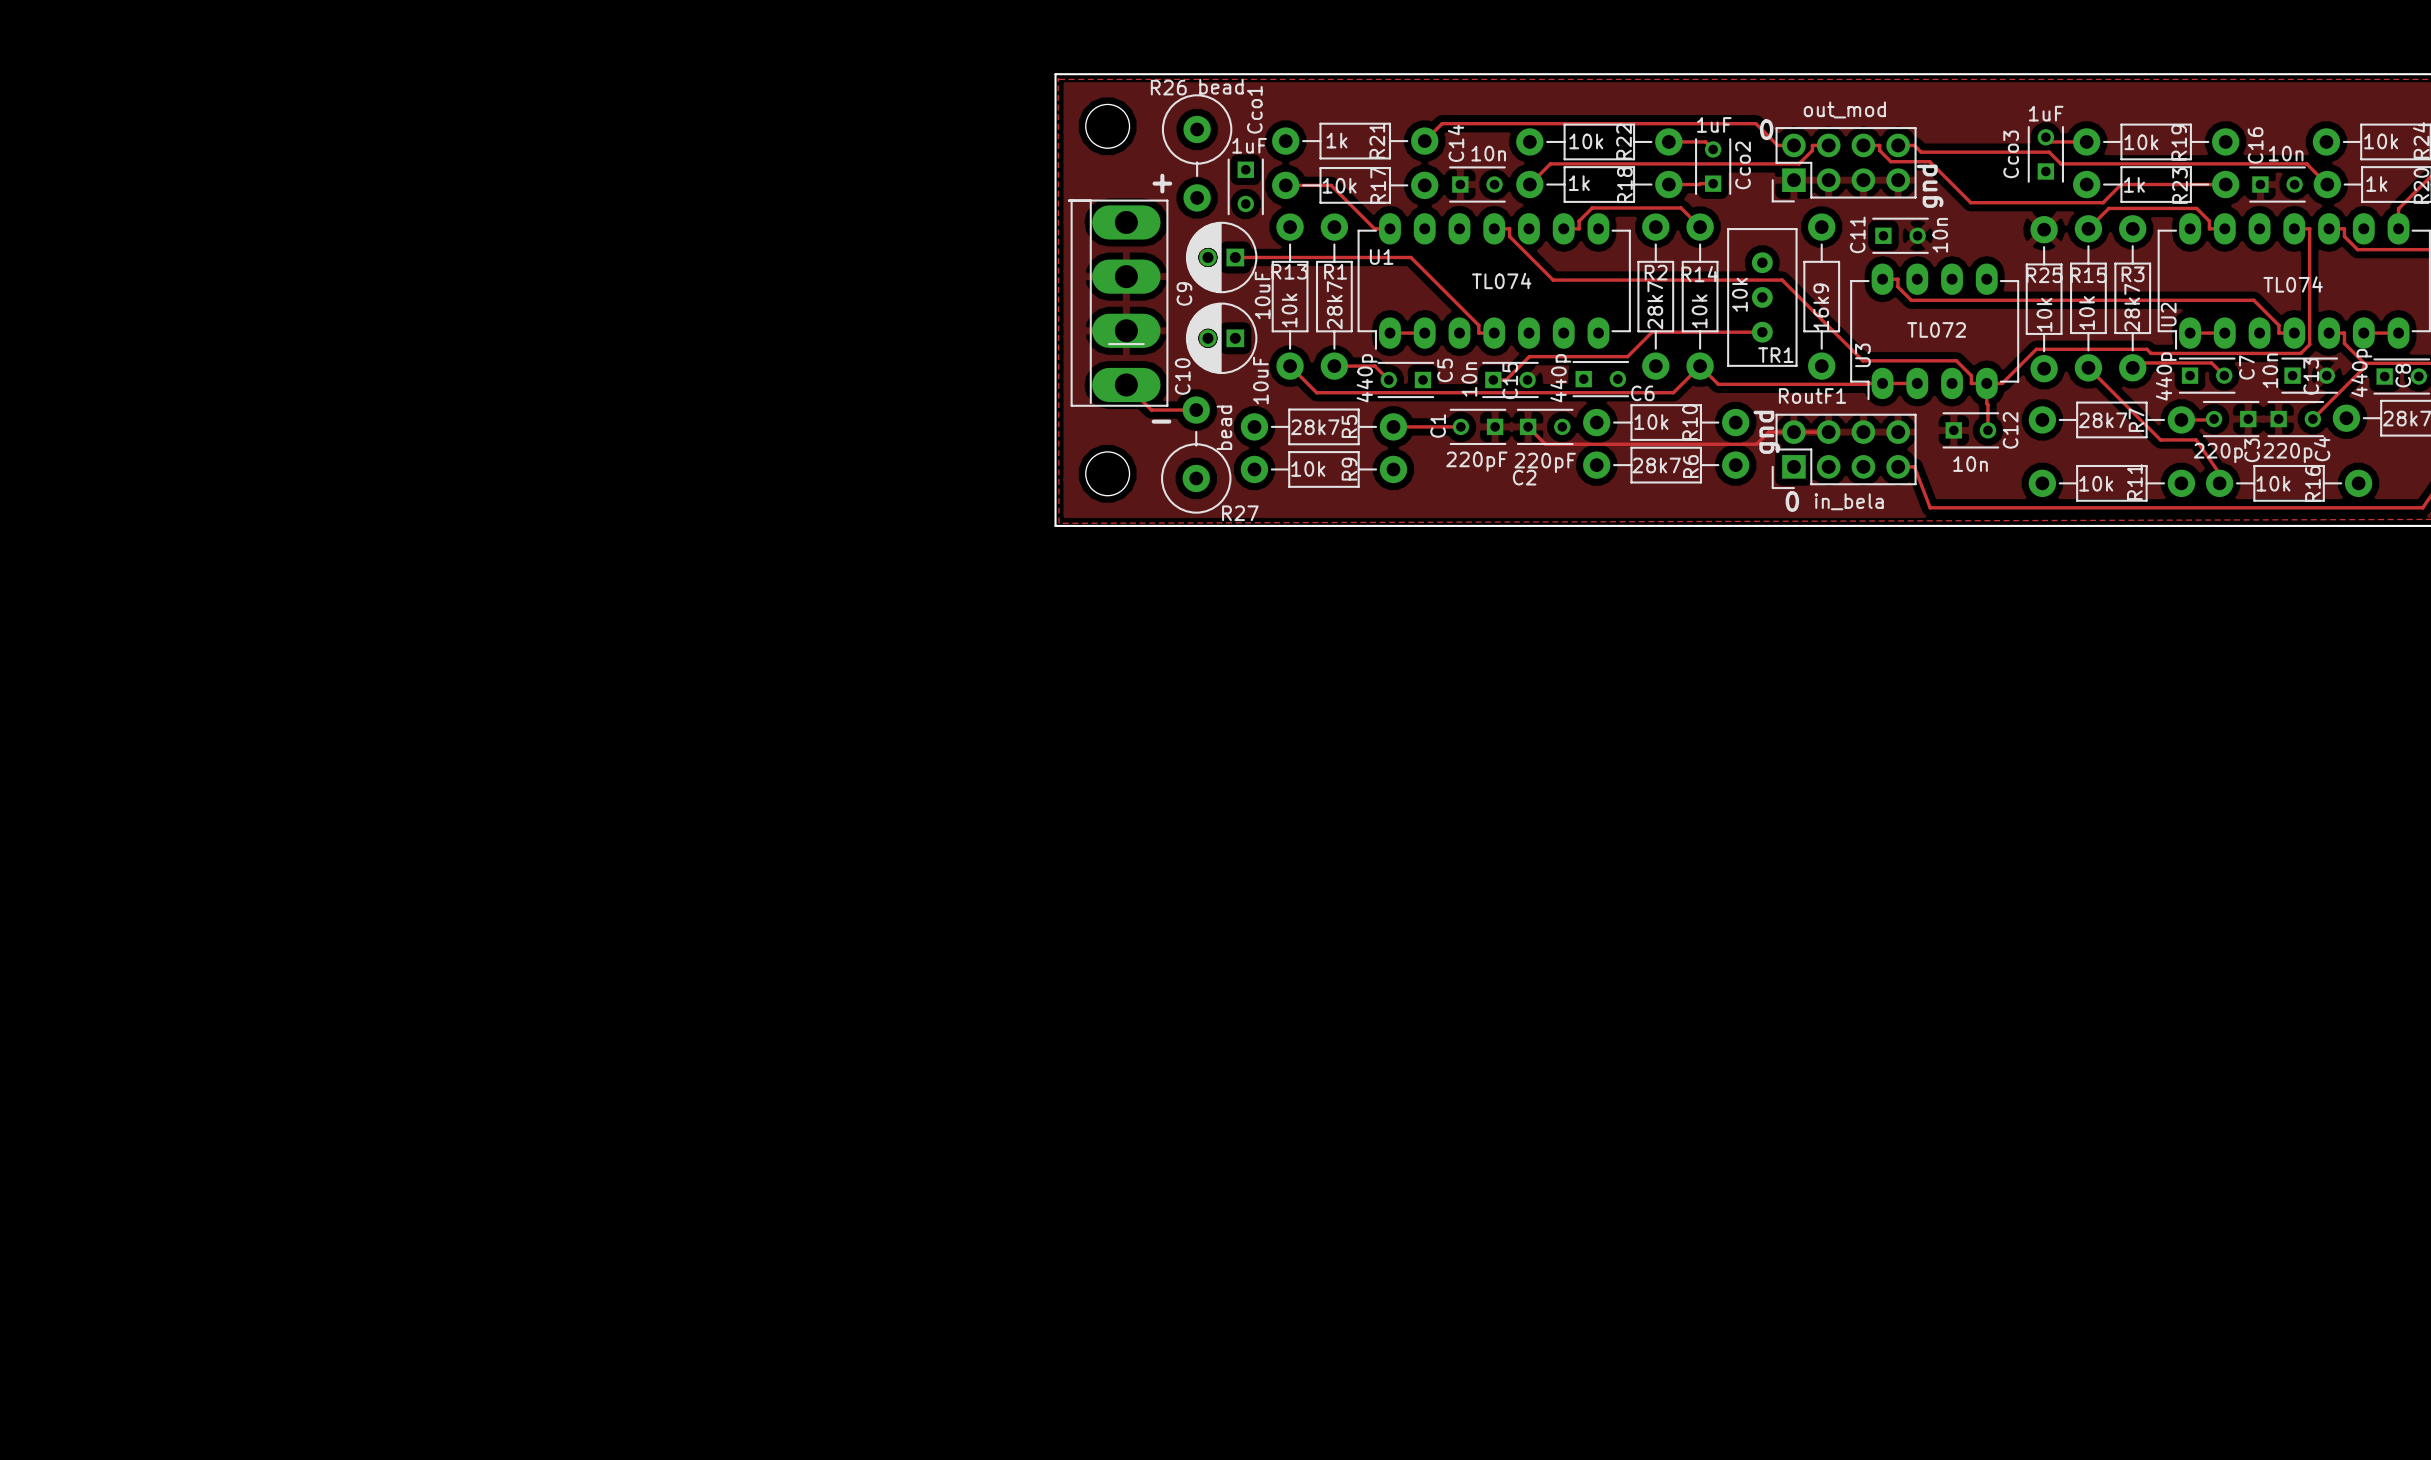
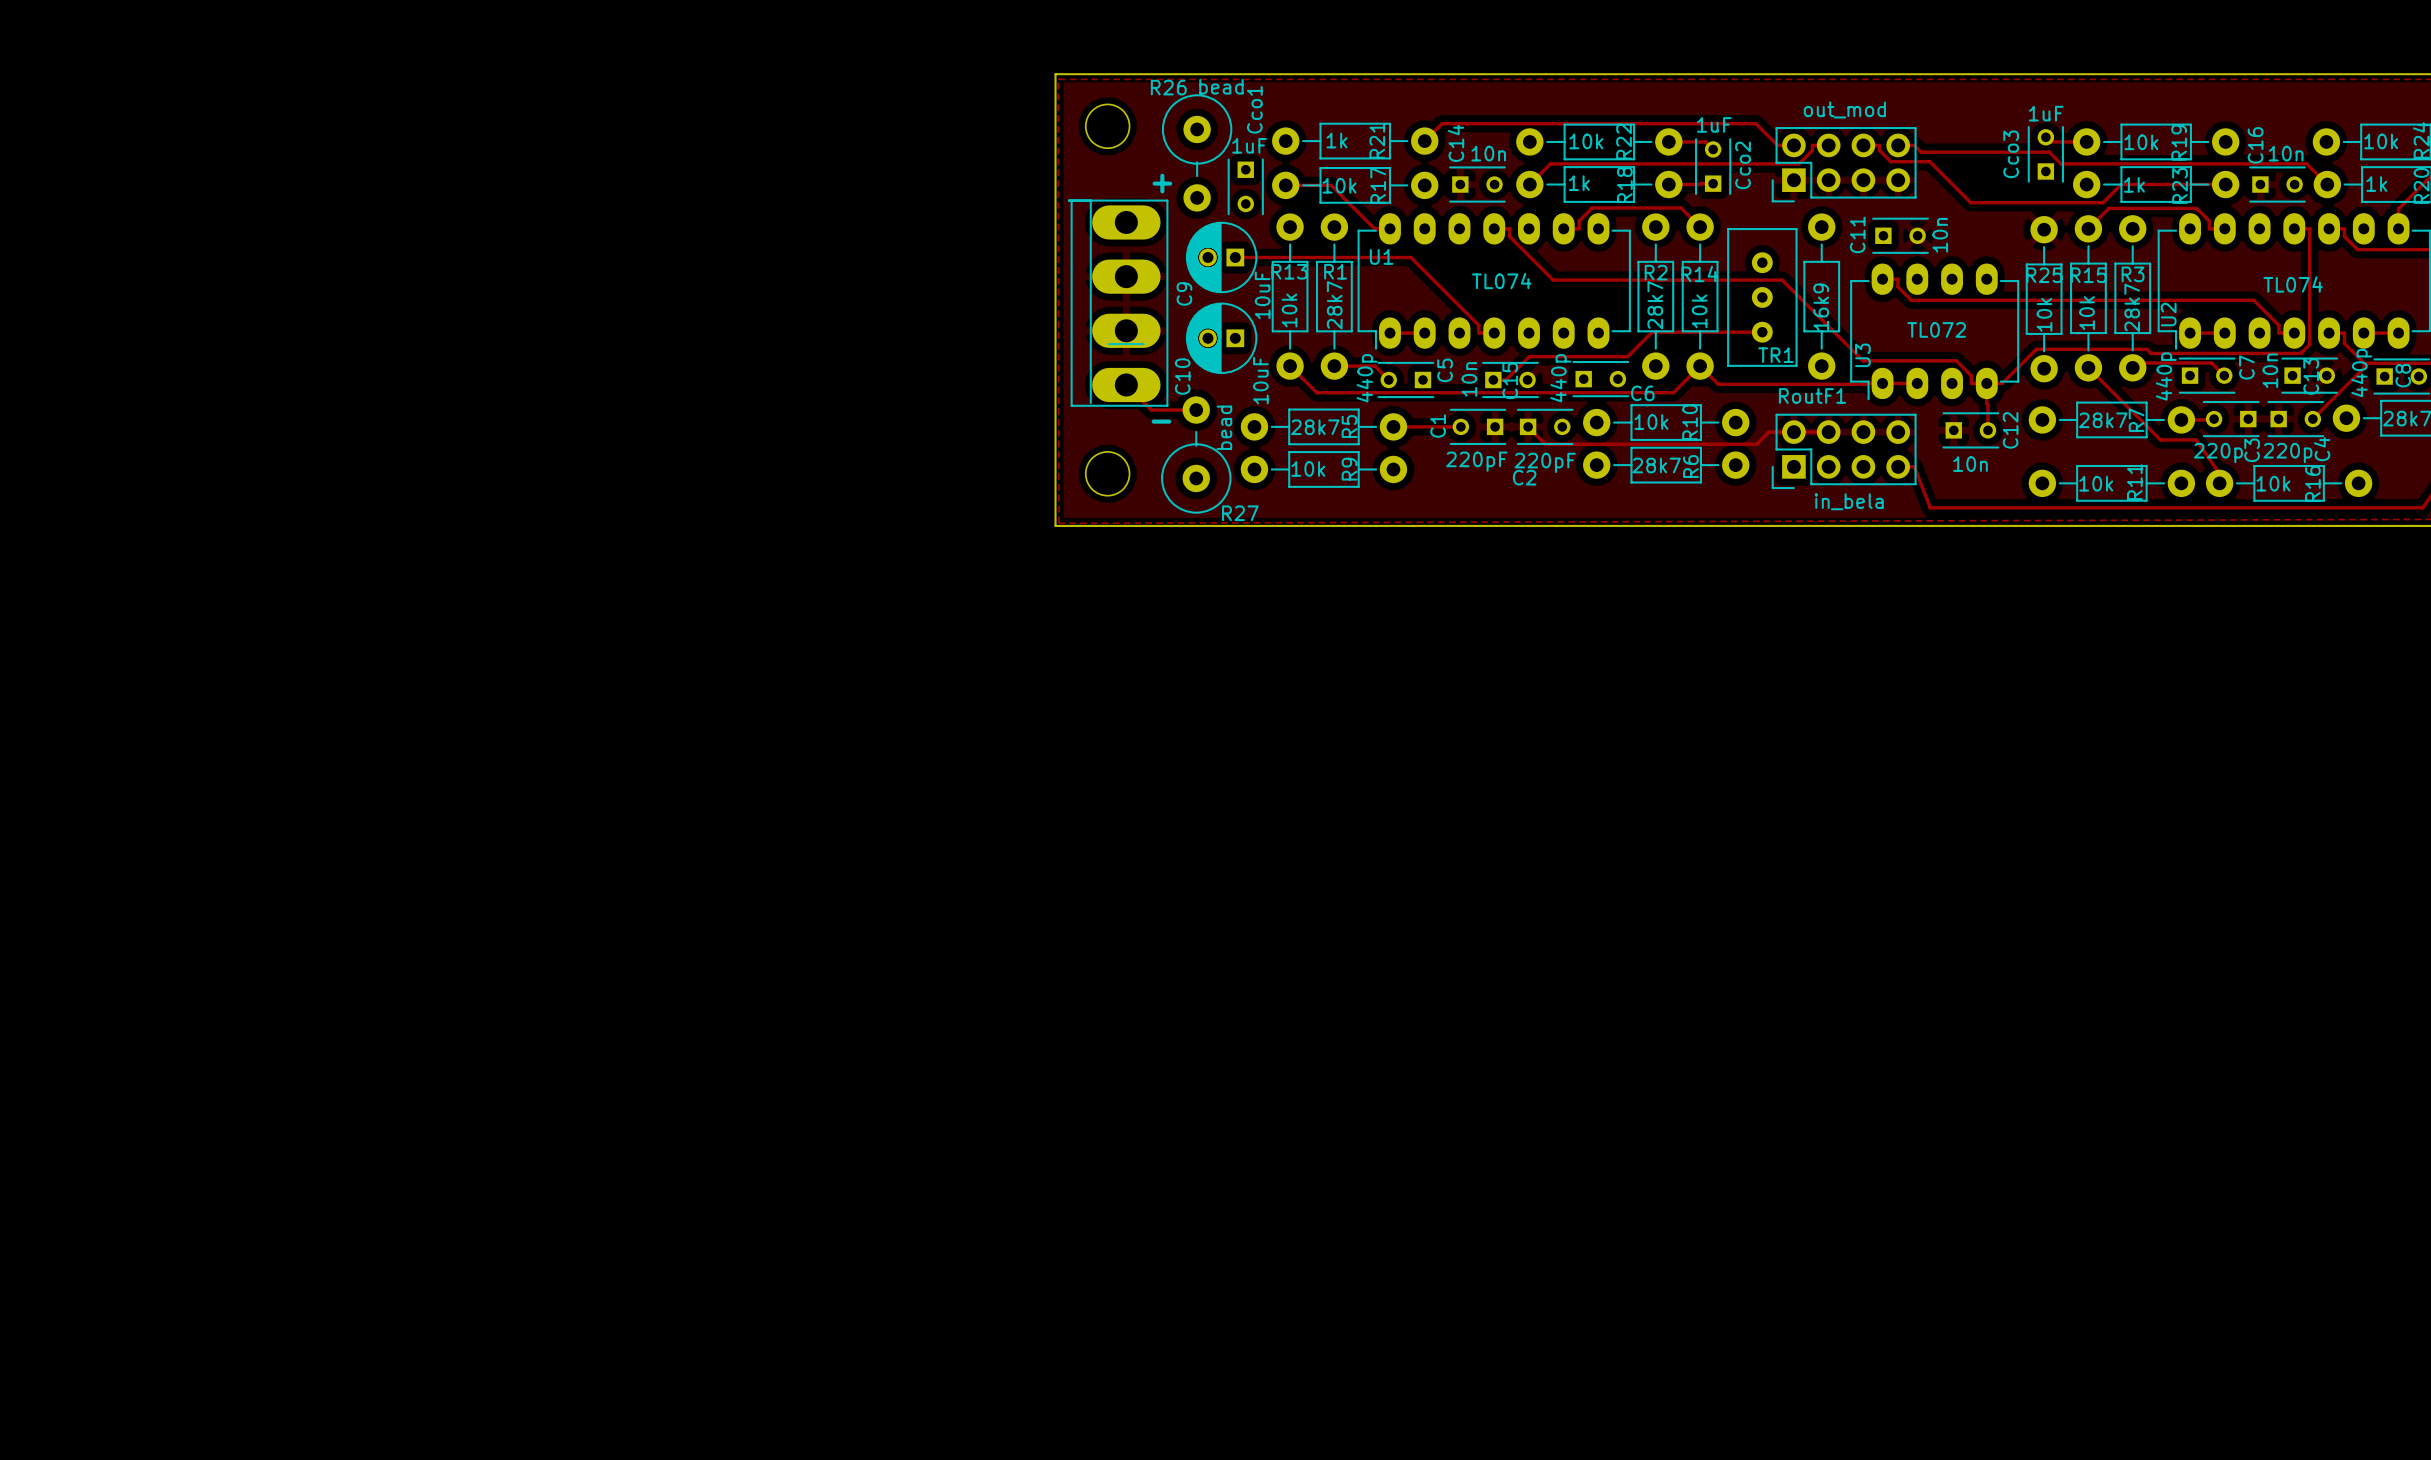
text: 0 (1766, 129) -> none
text: gnd (1930, 186) -> none
TR1 value: 10k (1739, 294) -> none
text: gnd (1766, 432) -> none
text: 0 (1792, 501) -> none

